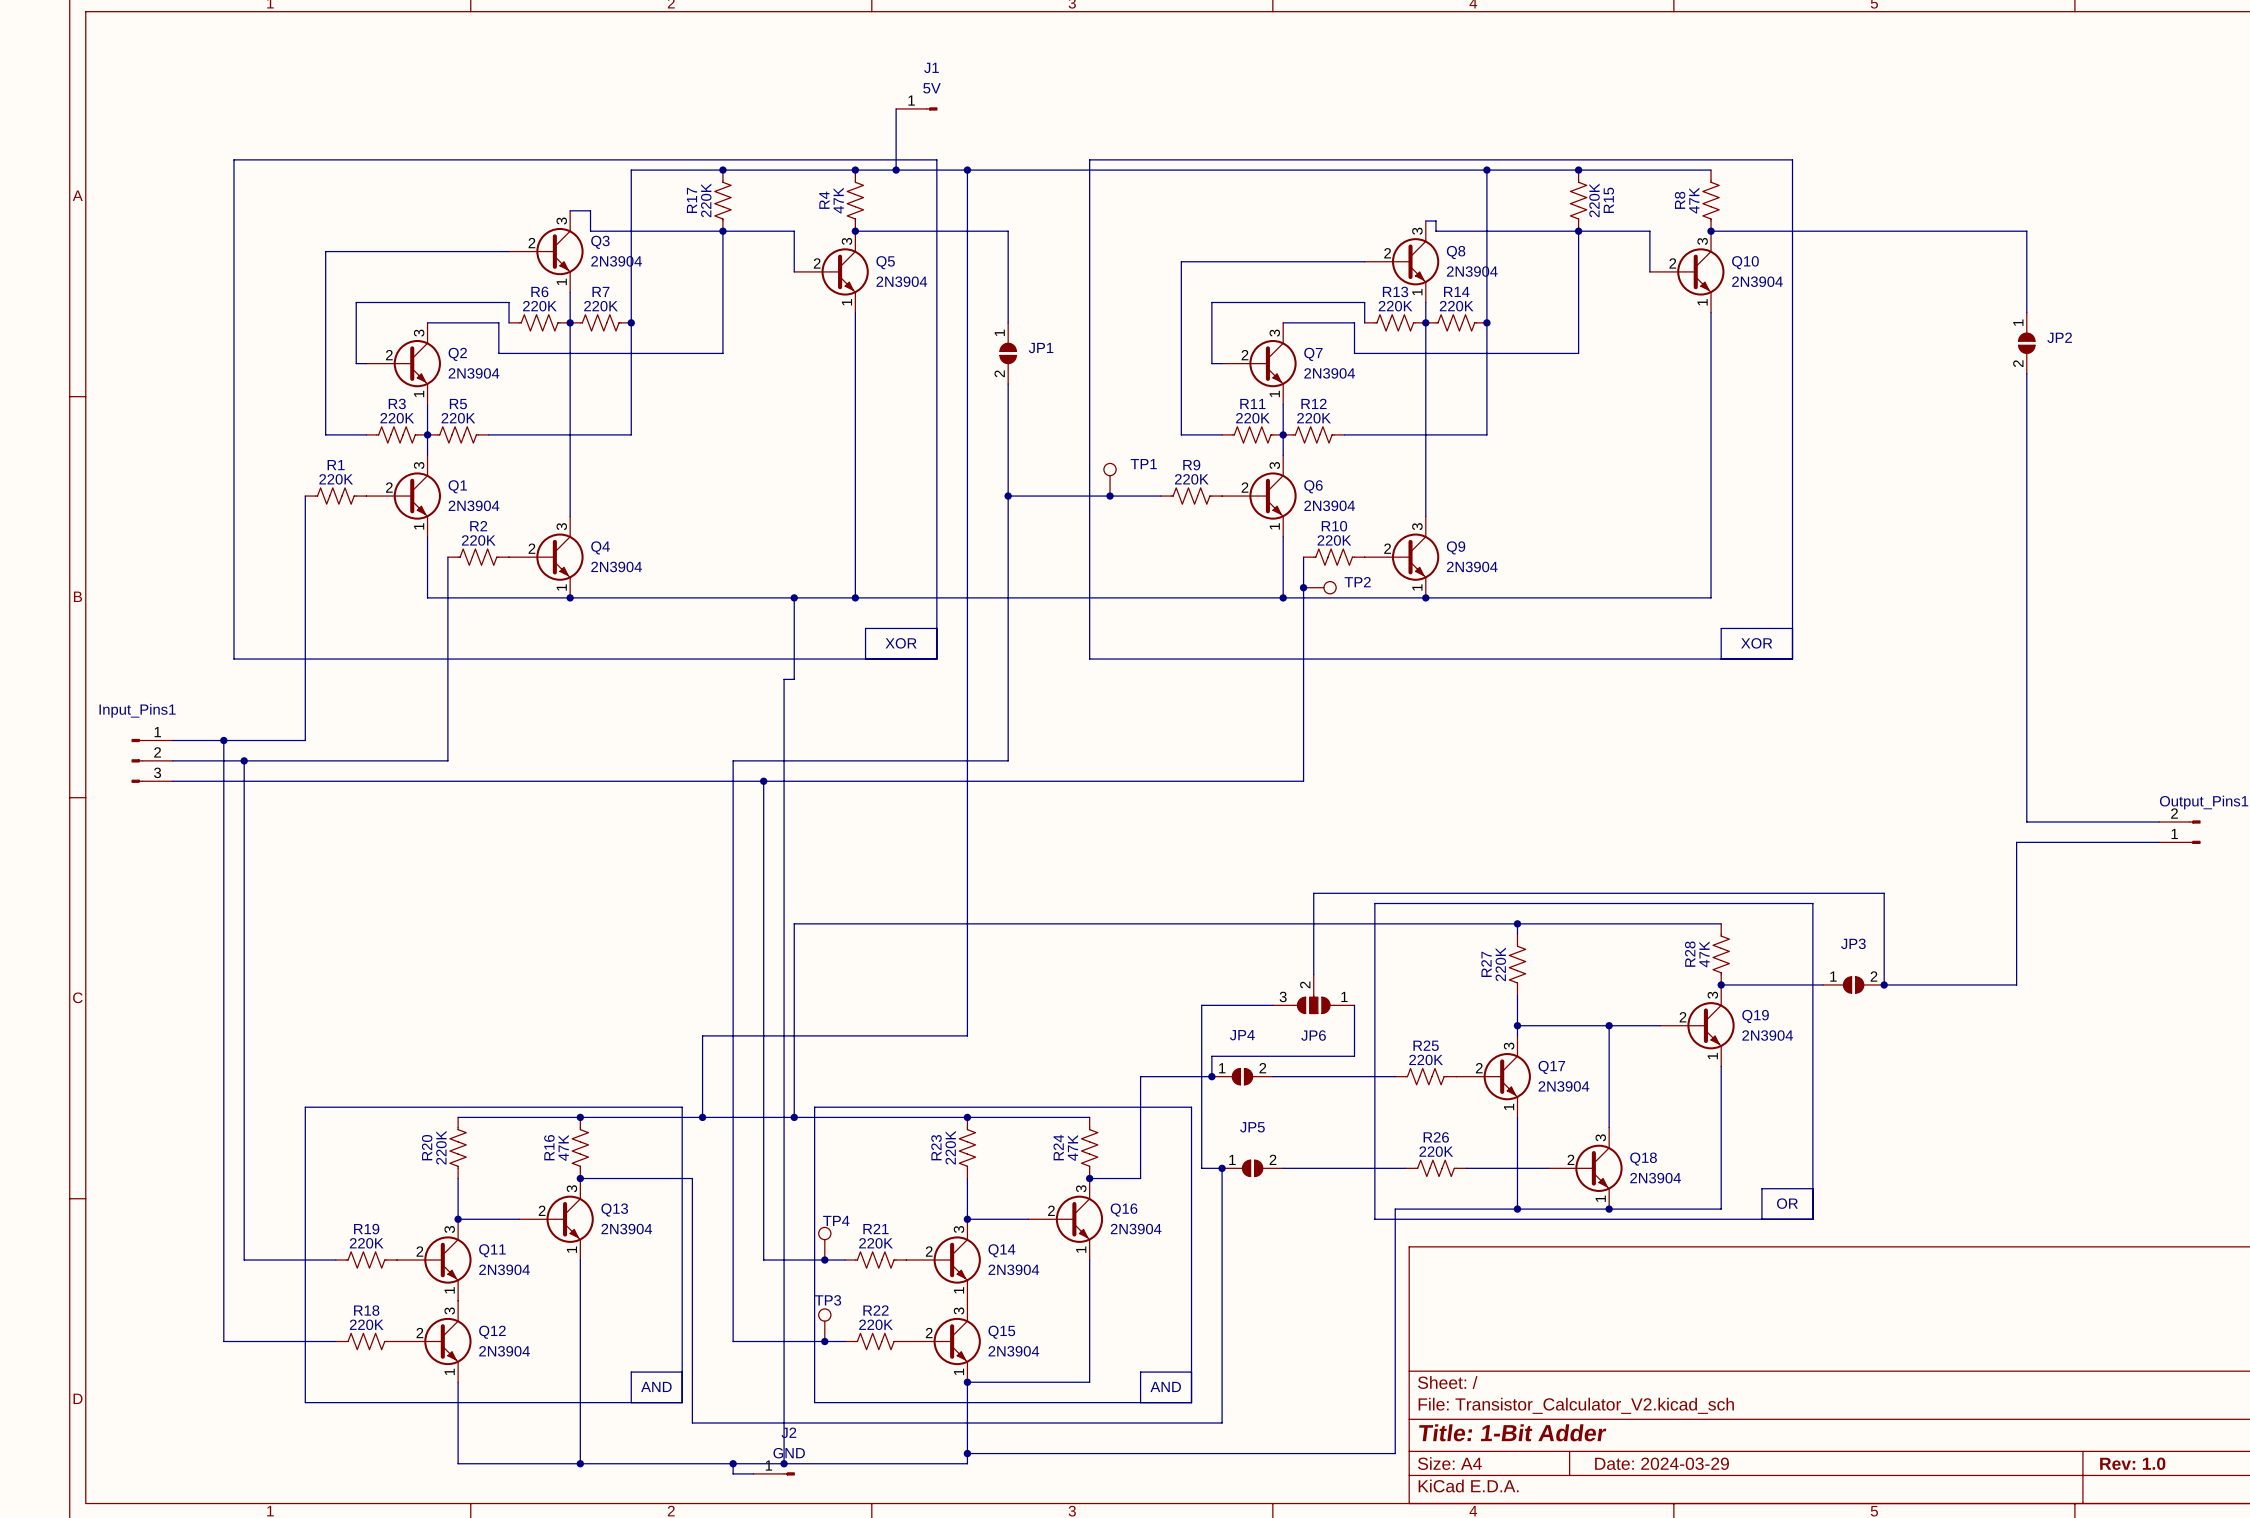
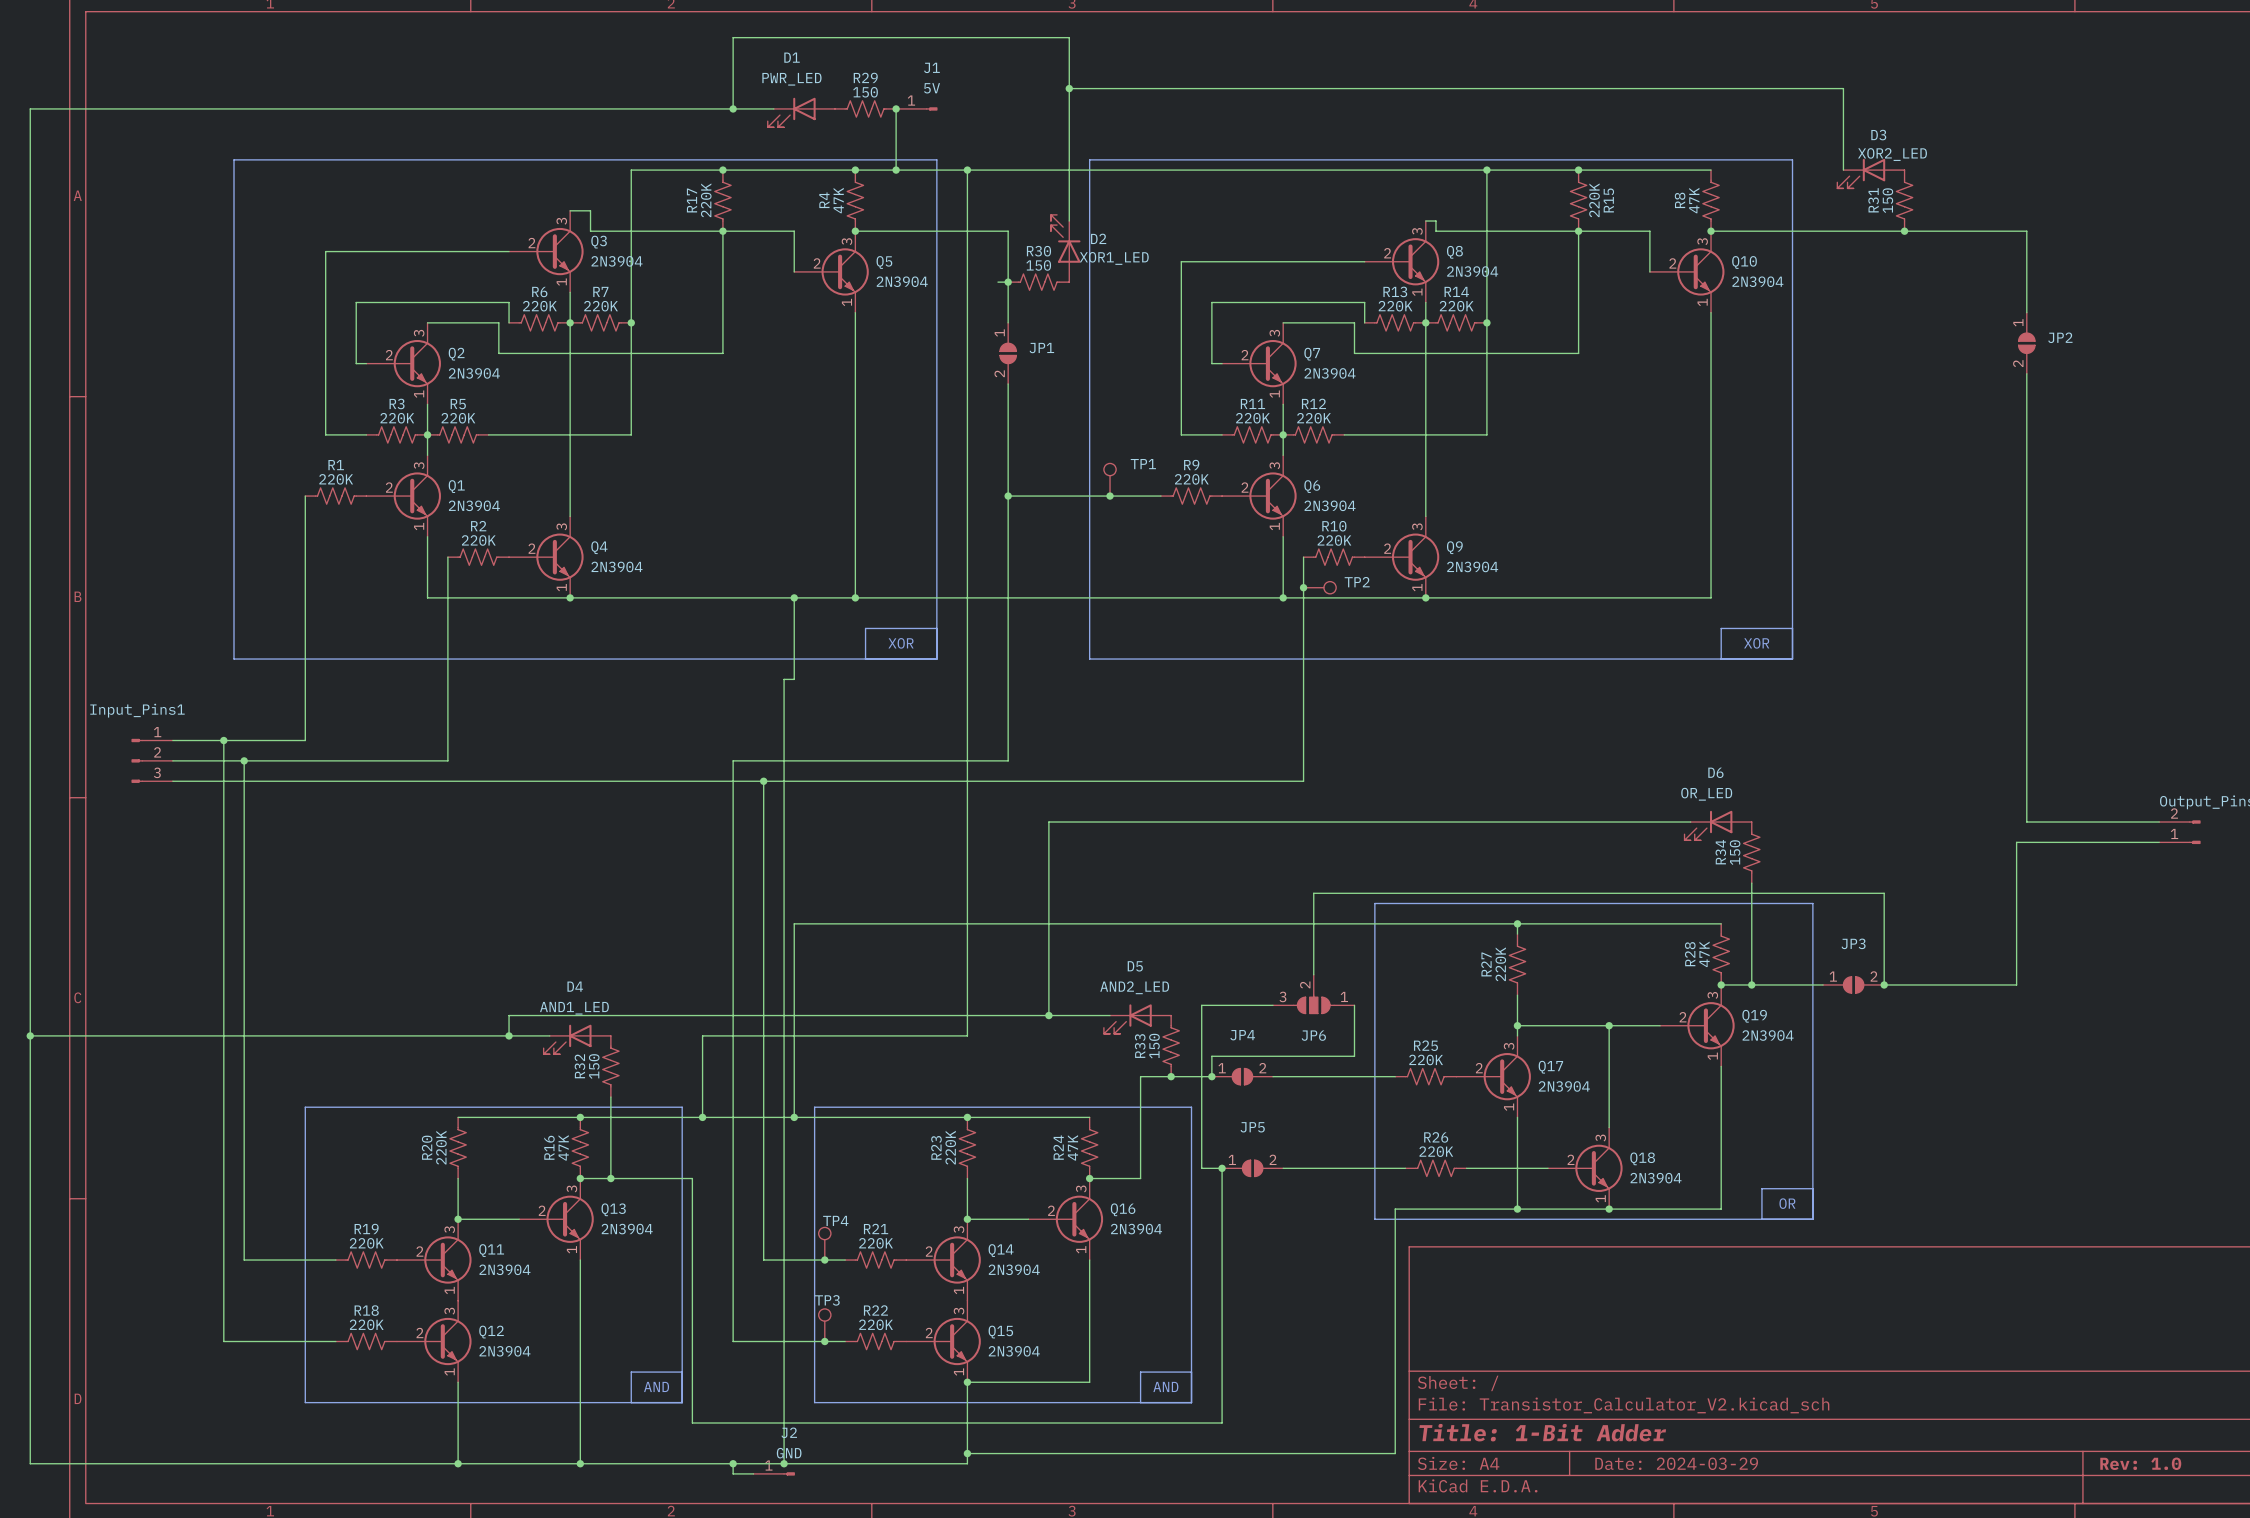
wire: none -> (1069, 88) (1843, 88) (1843, 170)
junction: none -> (1069, 88)
wire: none -> (733, 108) (733, 37) (1069, 37) (1069, 221)
junction: none -> (733, 108)
wire: none -> (773, 108) (30, 108) (30, 1463) (458, 1463)
R29: none -> 150 (865, 108)
junction: none -> (896, 108)
D1: none -> PWR_LED (801, 112)
D3: none -> XOR2_LED (1870, 173)
R31: none -> 150 (1904, 200)
junction: none -> (1904, 231)
D2: none -> XOR1_LED (1065, 248)
wire: none -> (997, 282) (1008, 282)
junction: none -> (1008, 282)
R30: none -> 150 (1038, 282)
wire: none -> (1690, 822) (1048, 822) (1048, 1015)
D6: none -> OR_LED (1718, 825)
R34: none -> 150 (1751, 852)
wire: none -> (1751, 883) (1751, 984)
junction: none -> (1751, 984)
junction: none -> (1048, 1015)
wire: none -> (1110, 1015) (509, 1015) (509, 1035)
D5: none -> AND2_LED (1137, 1019)
wire: none -> (30, 1035) (549, 1035)
junction: none -> (30, 1035)
junction: none -> (509, 1035)
D4: none -> AND1_LED (577, 1039)
R33: none -> 150 (1171, 1046)
R32: none -> 150 (610, 1066)
junction: none -> (1171, 1076)
wire: none -> (610, 1097) (610, 1178)
junction: none -> (610, 1178)
junction: none -> (458, 1463)

